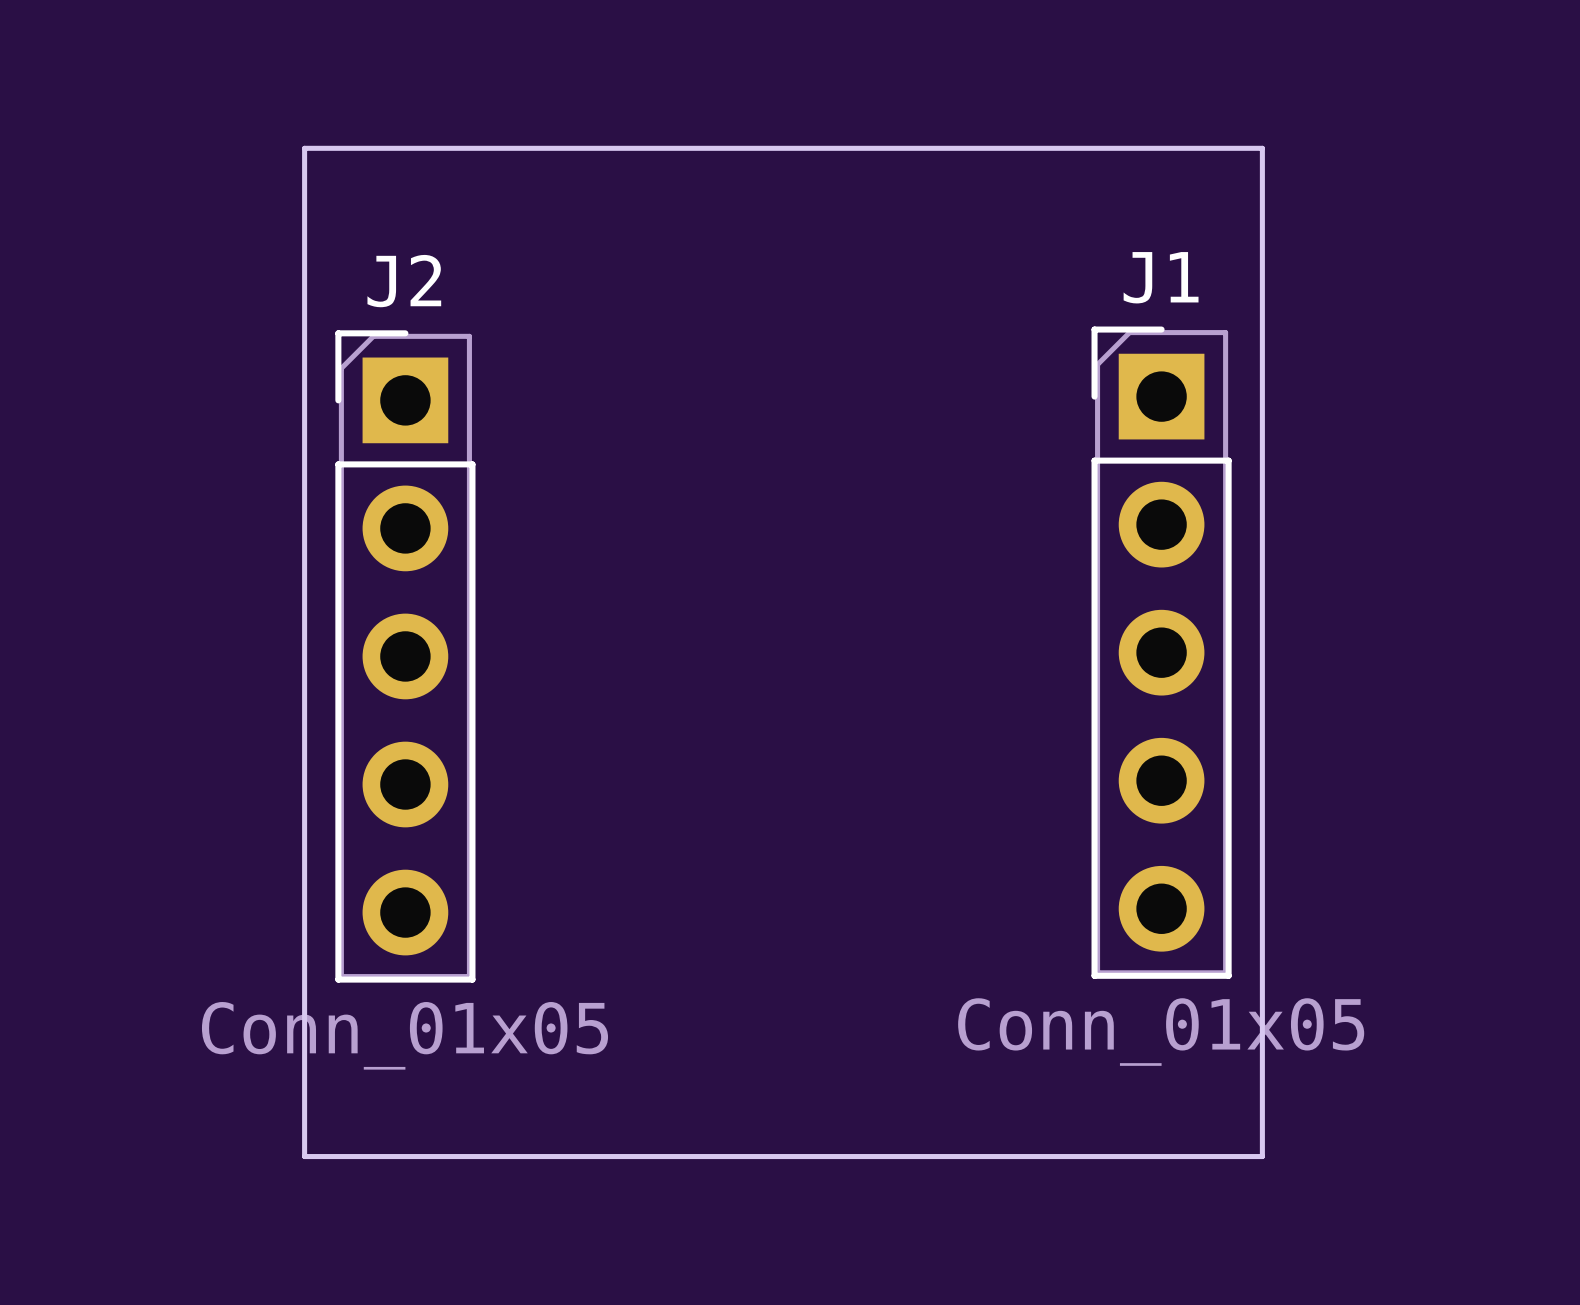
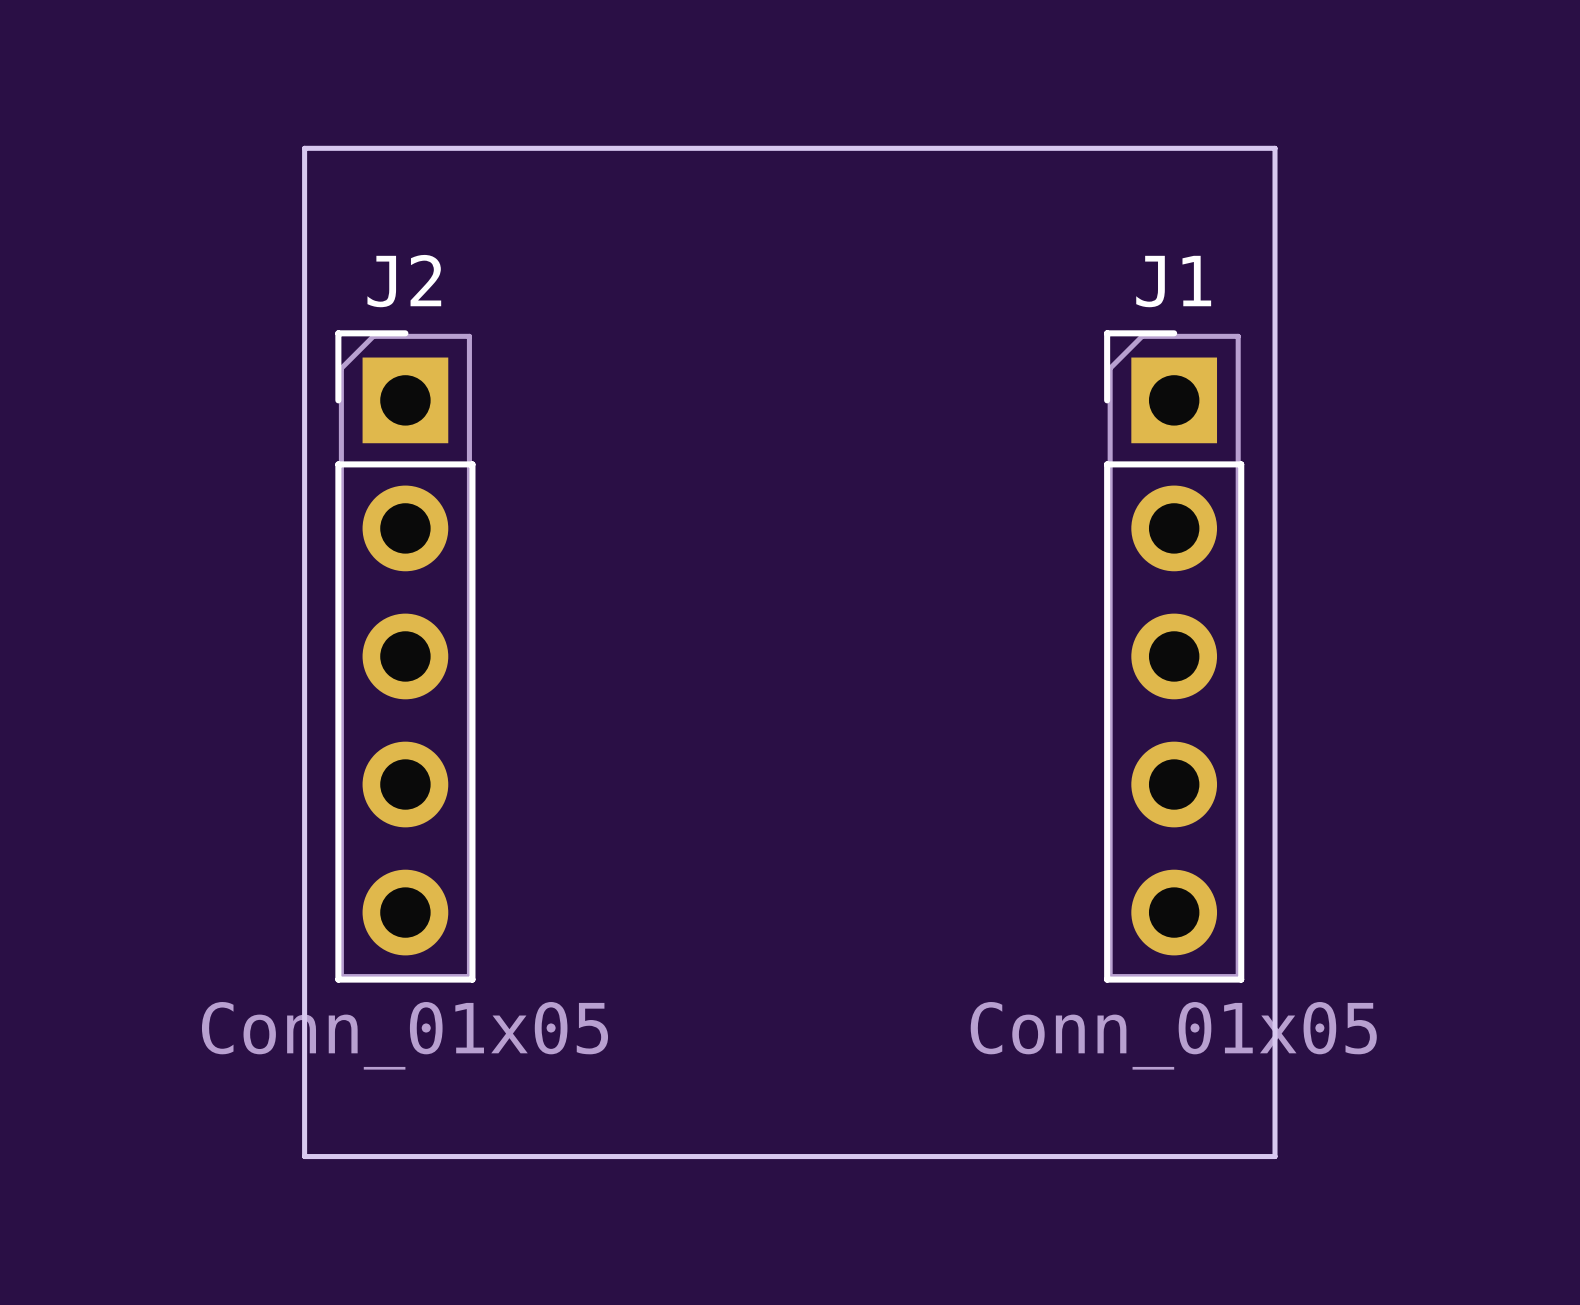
board edge: (1262, 148) (1262, 1156) -> (1262, 148) (1275, 148) (1275, 1156) (1262, 1156)
J1 position: (1161, 652) -> (1174, 656)

